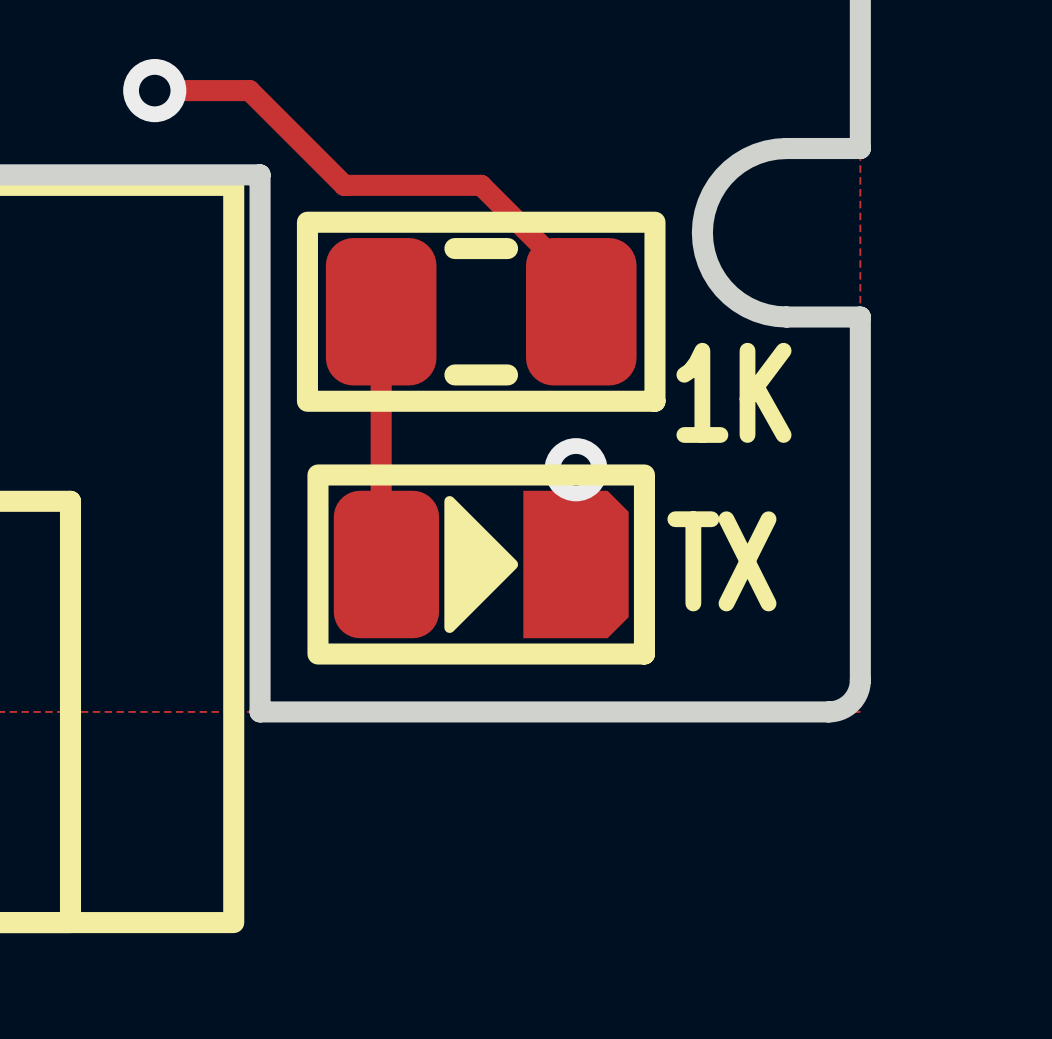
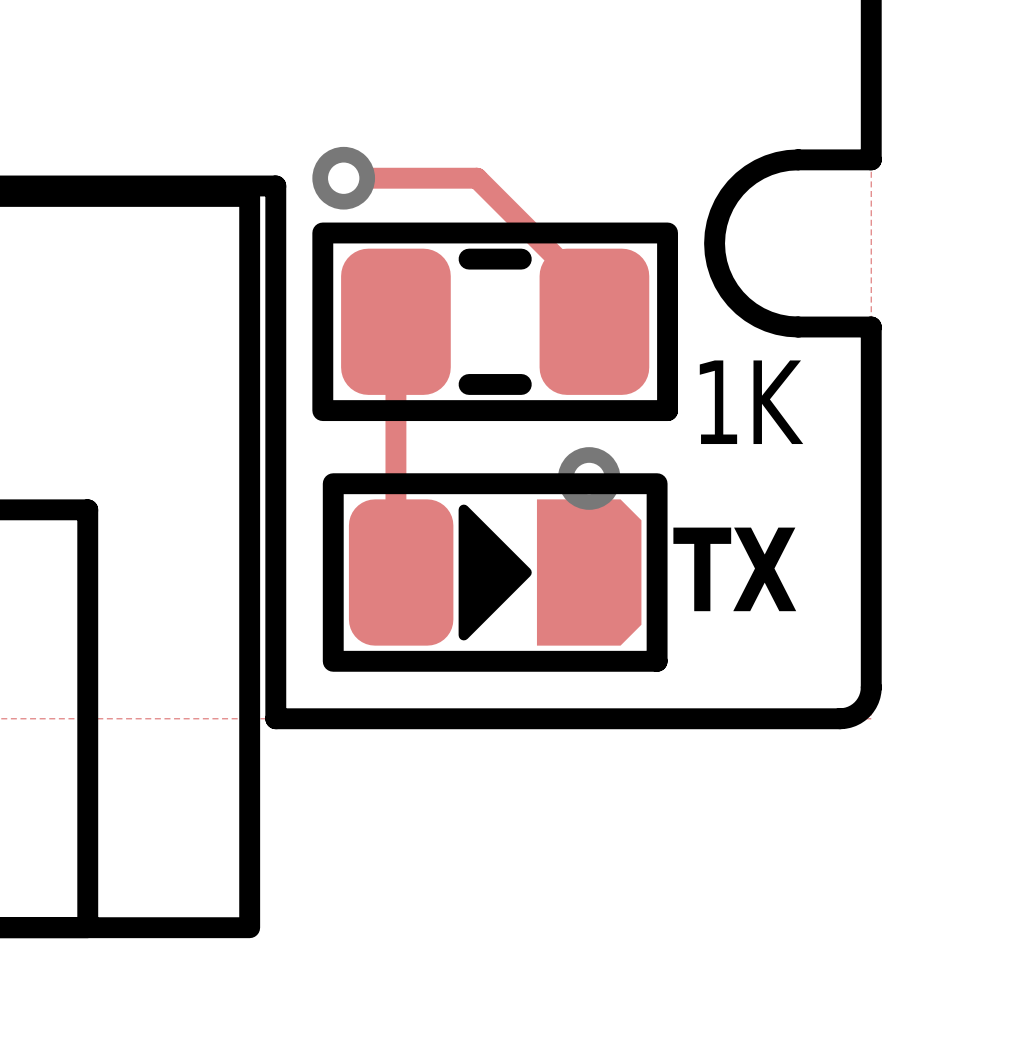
track: (154, 90) (249, 90) (344, 185) (481, 185) -> (343, 178) (476, 178) (495, 196)
via: (154, 90) -> none
via: none -> (343, 178)

